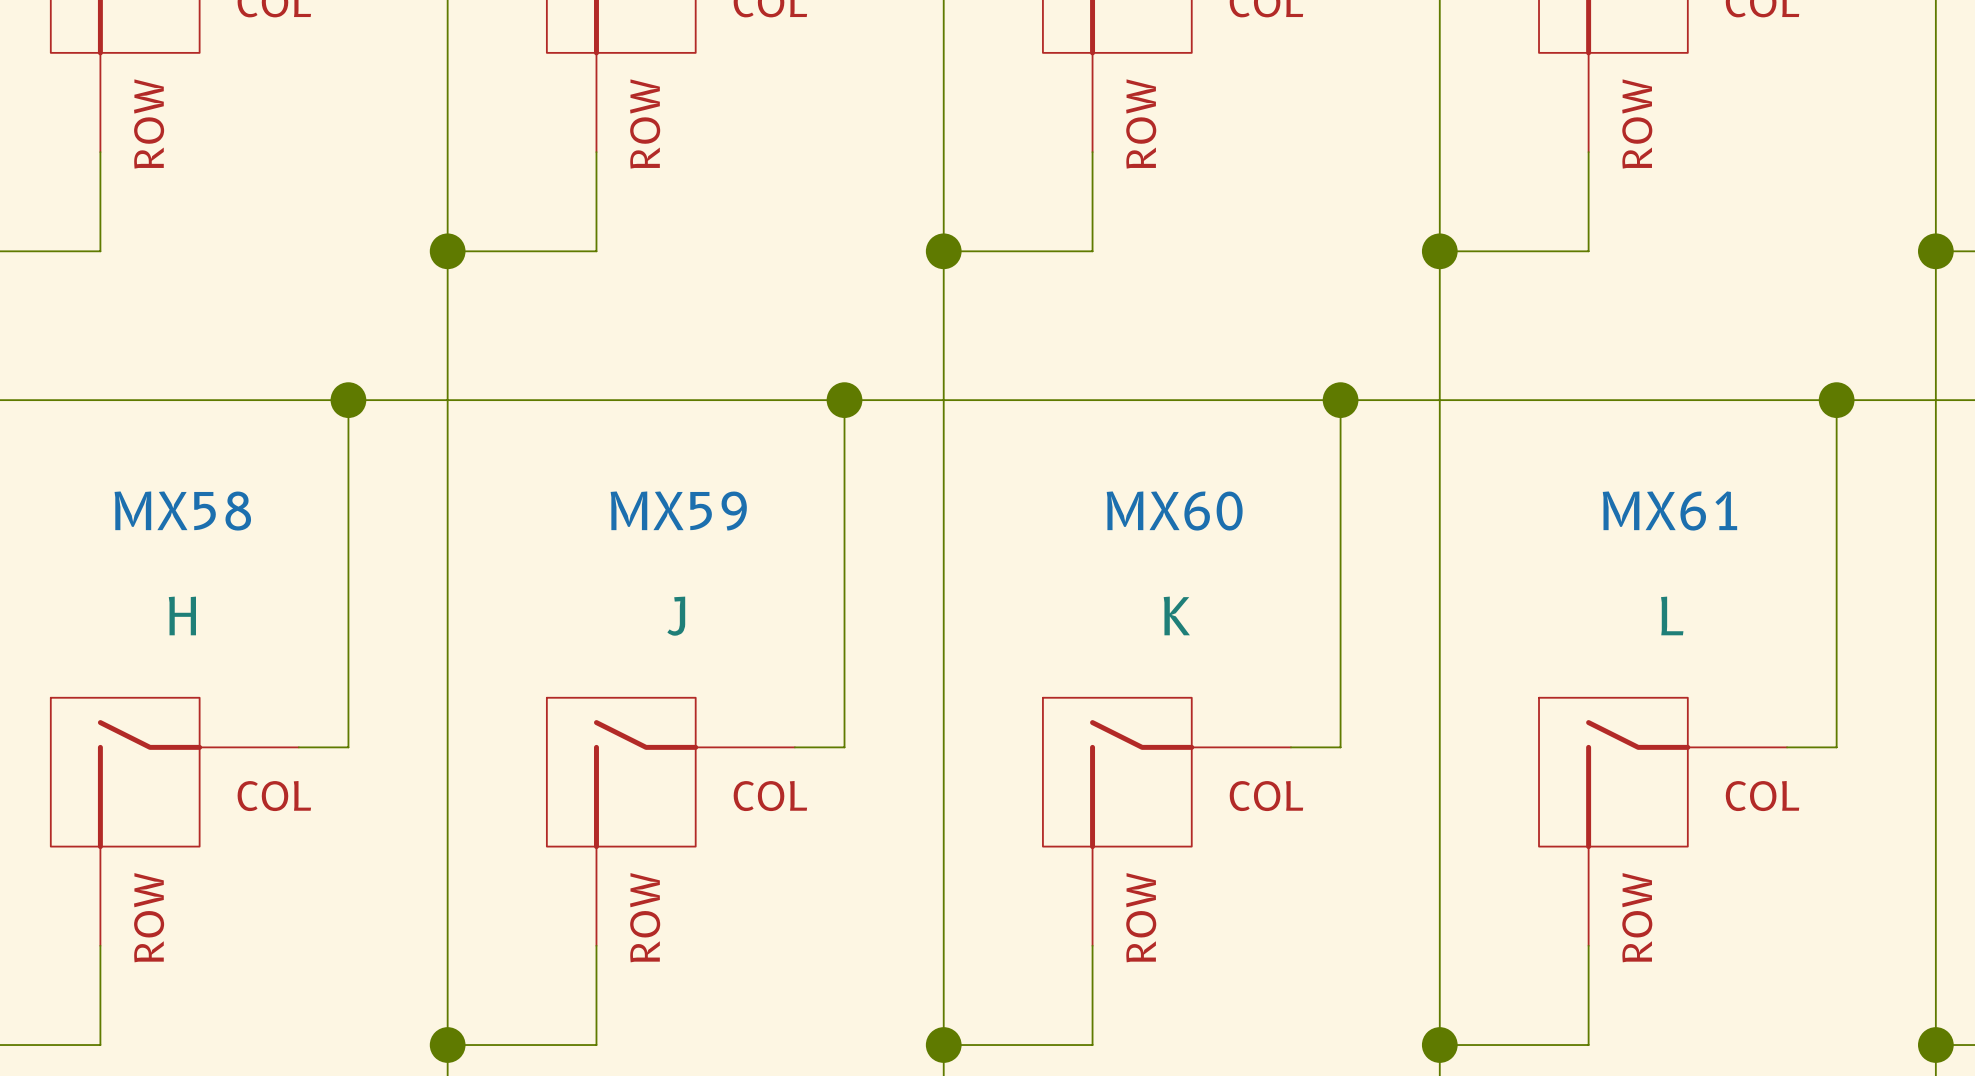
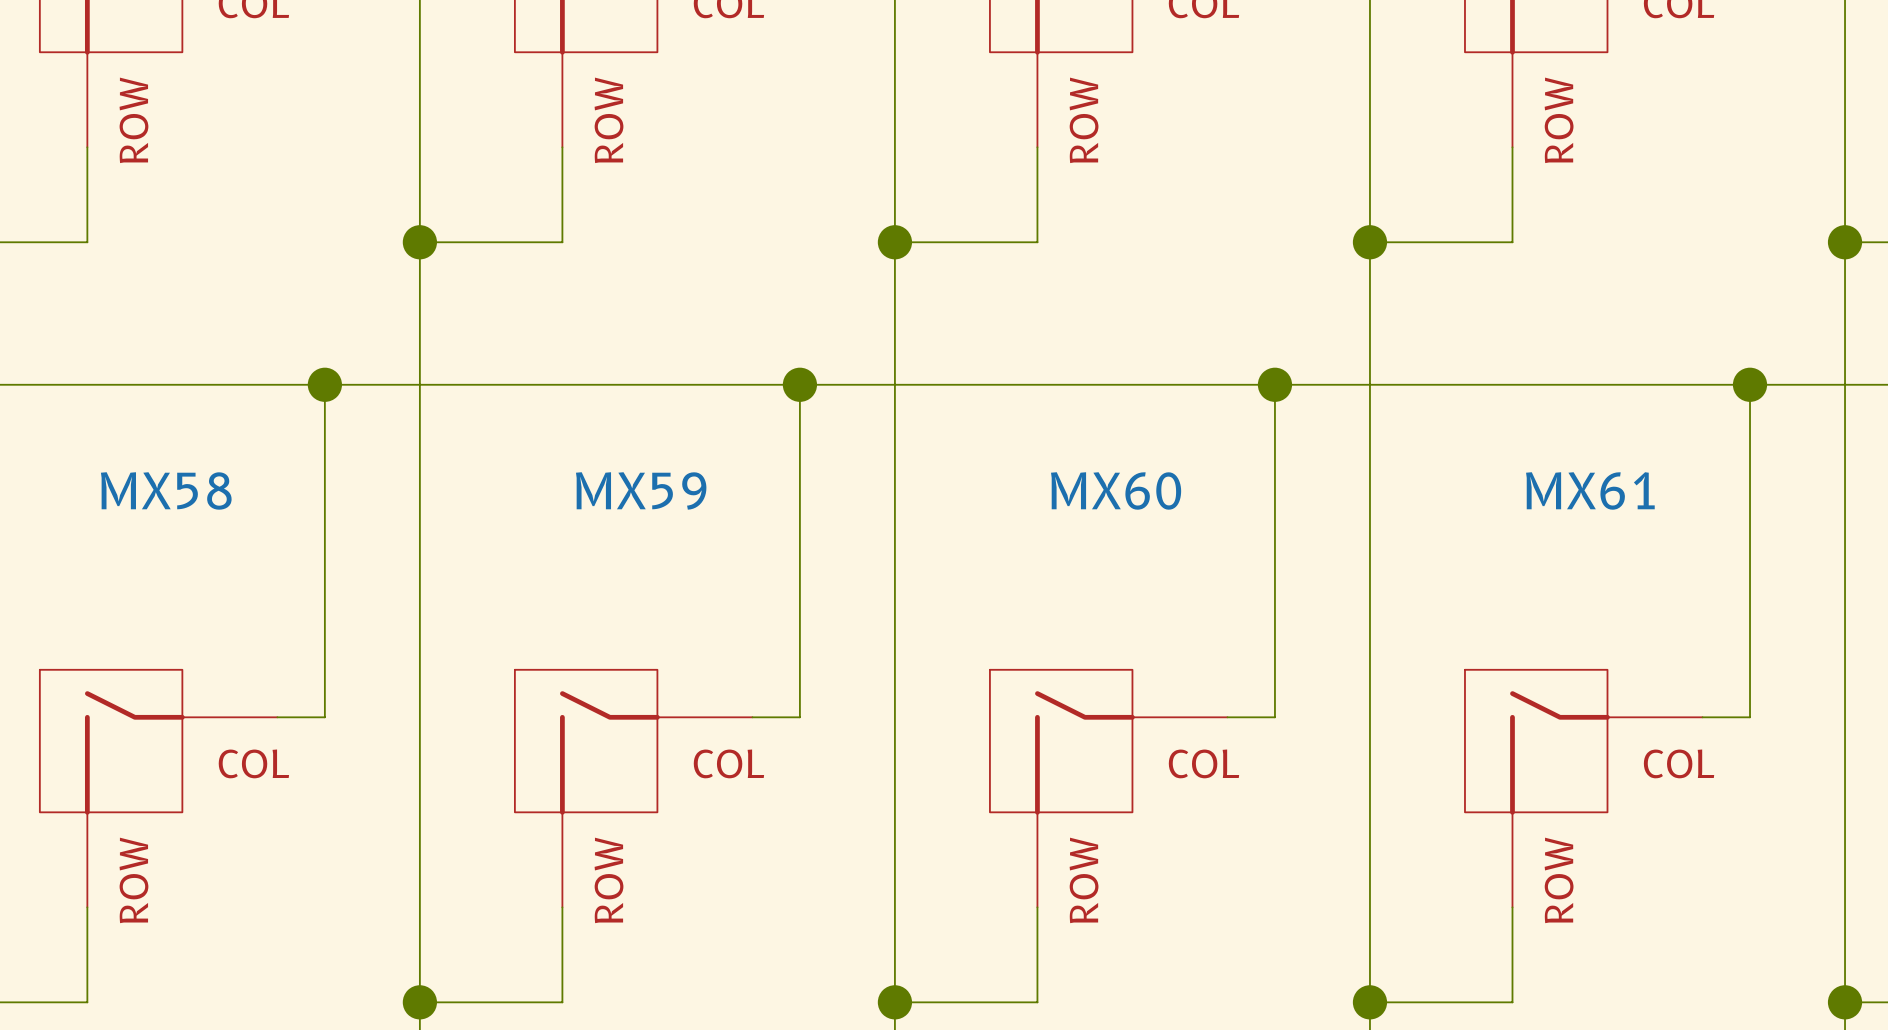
MX58 value: H (182, 615) -> none
MX60 value: K (1176, 615) -> none
MX61 value: L (1672, 615) -> none
MX59 value: J (676, 616) -> none

